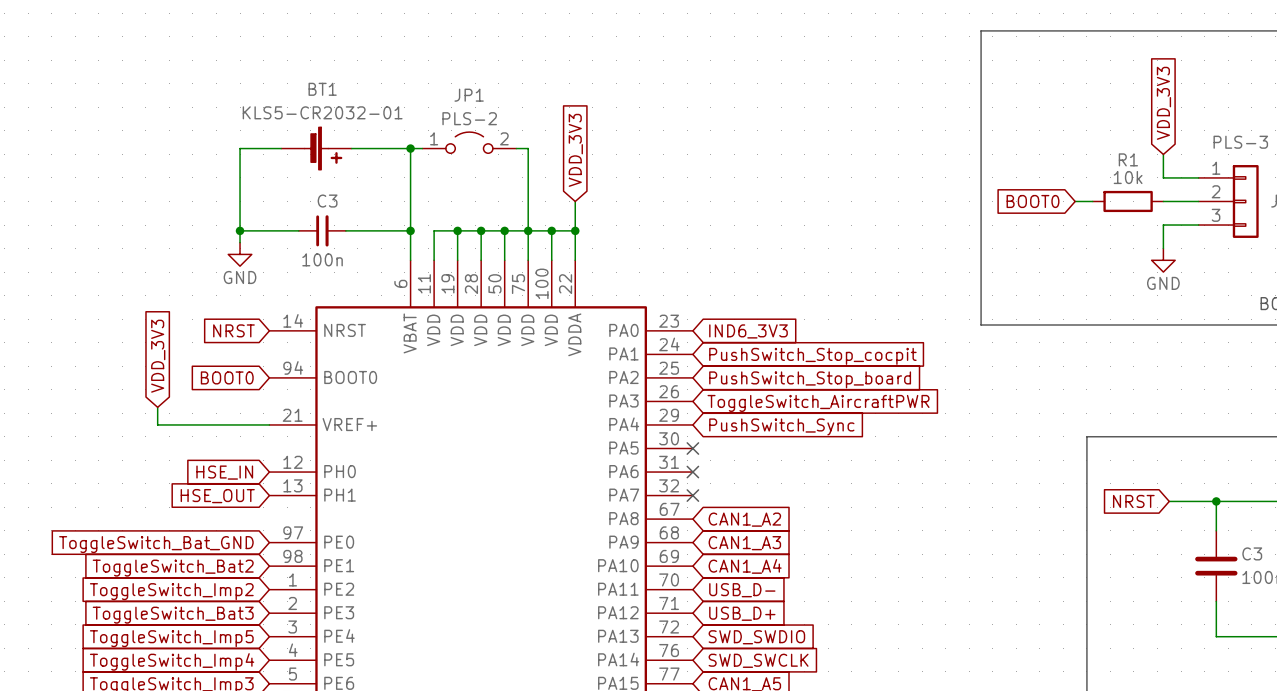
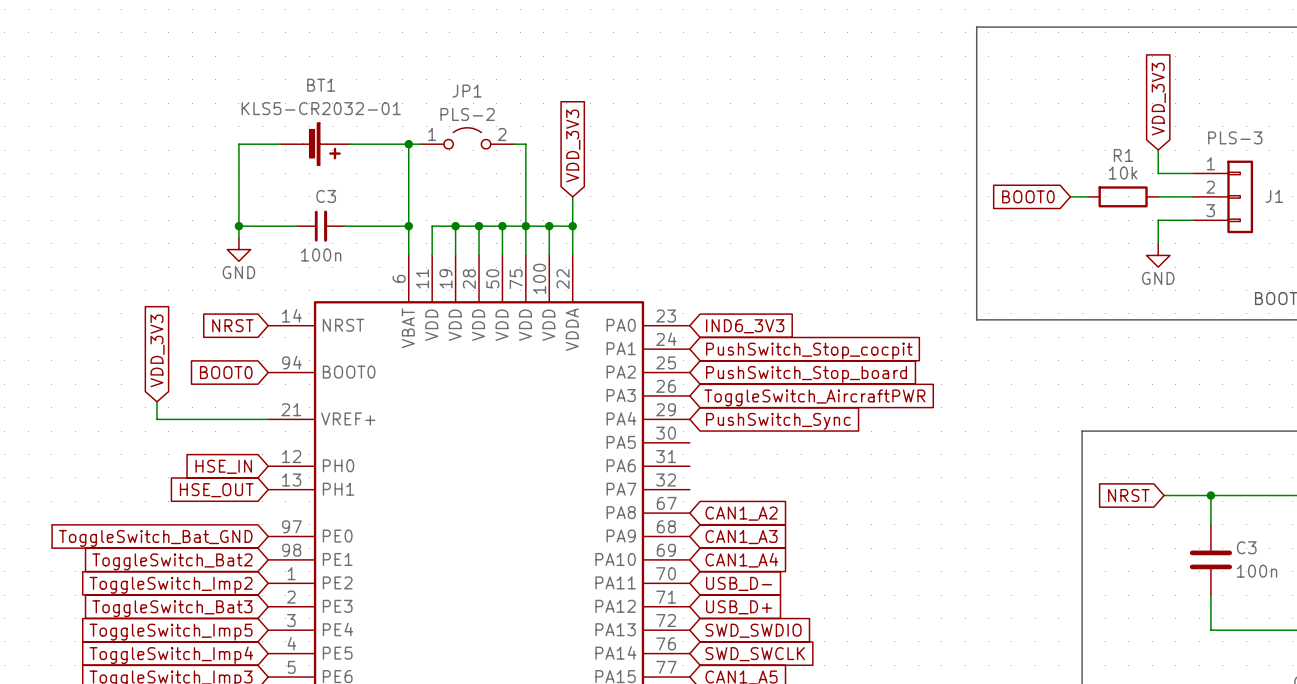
no-connect mark: (692, 448) -> none
no-connect mark: (692, 472) -> none
no-connect mark: (692, 495) -> none

